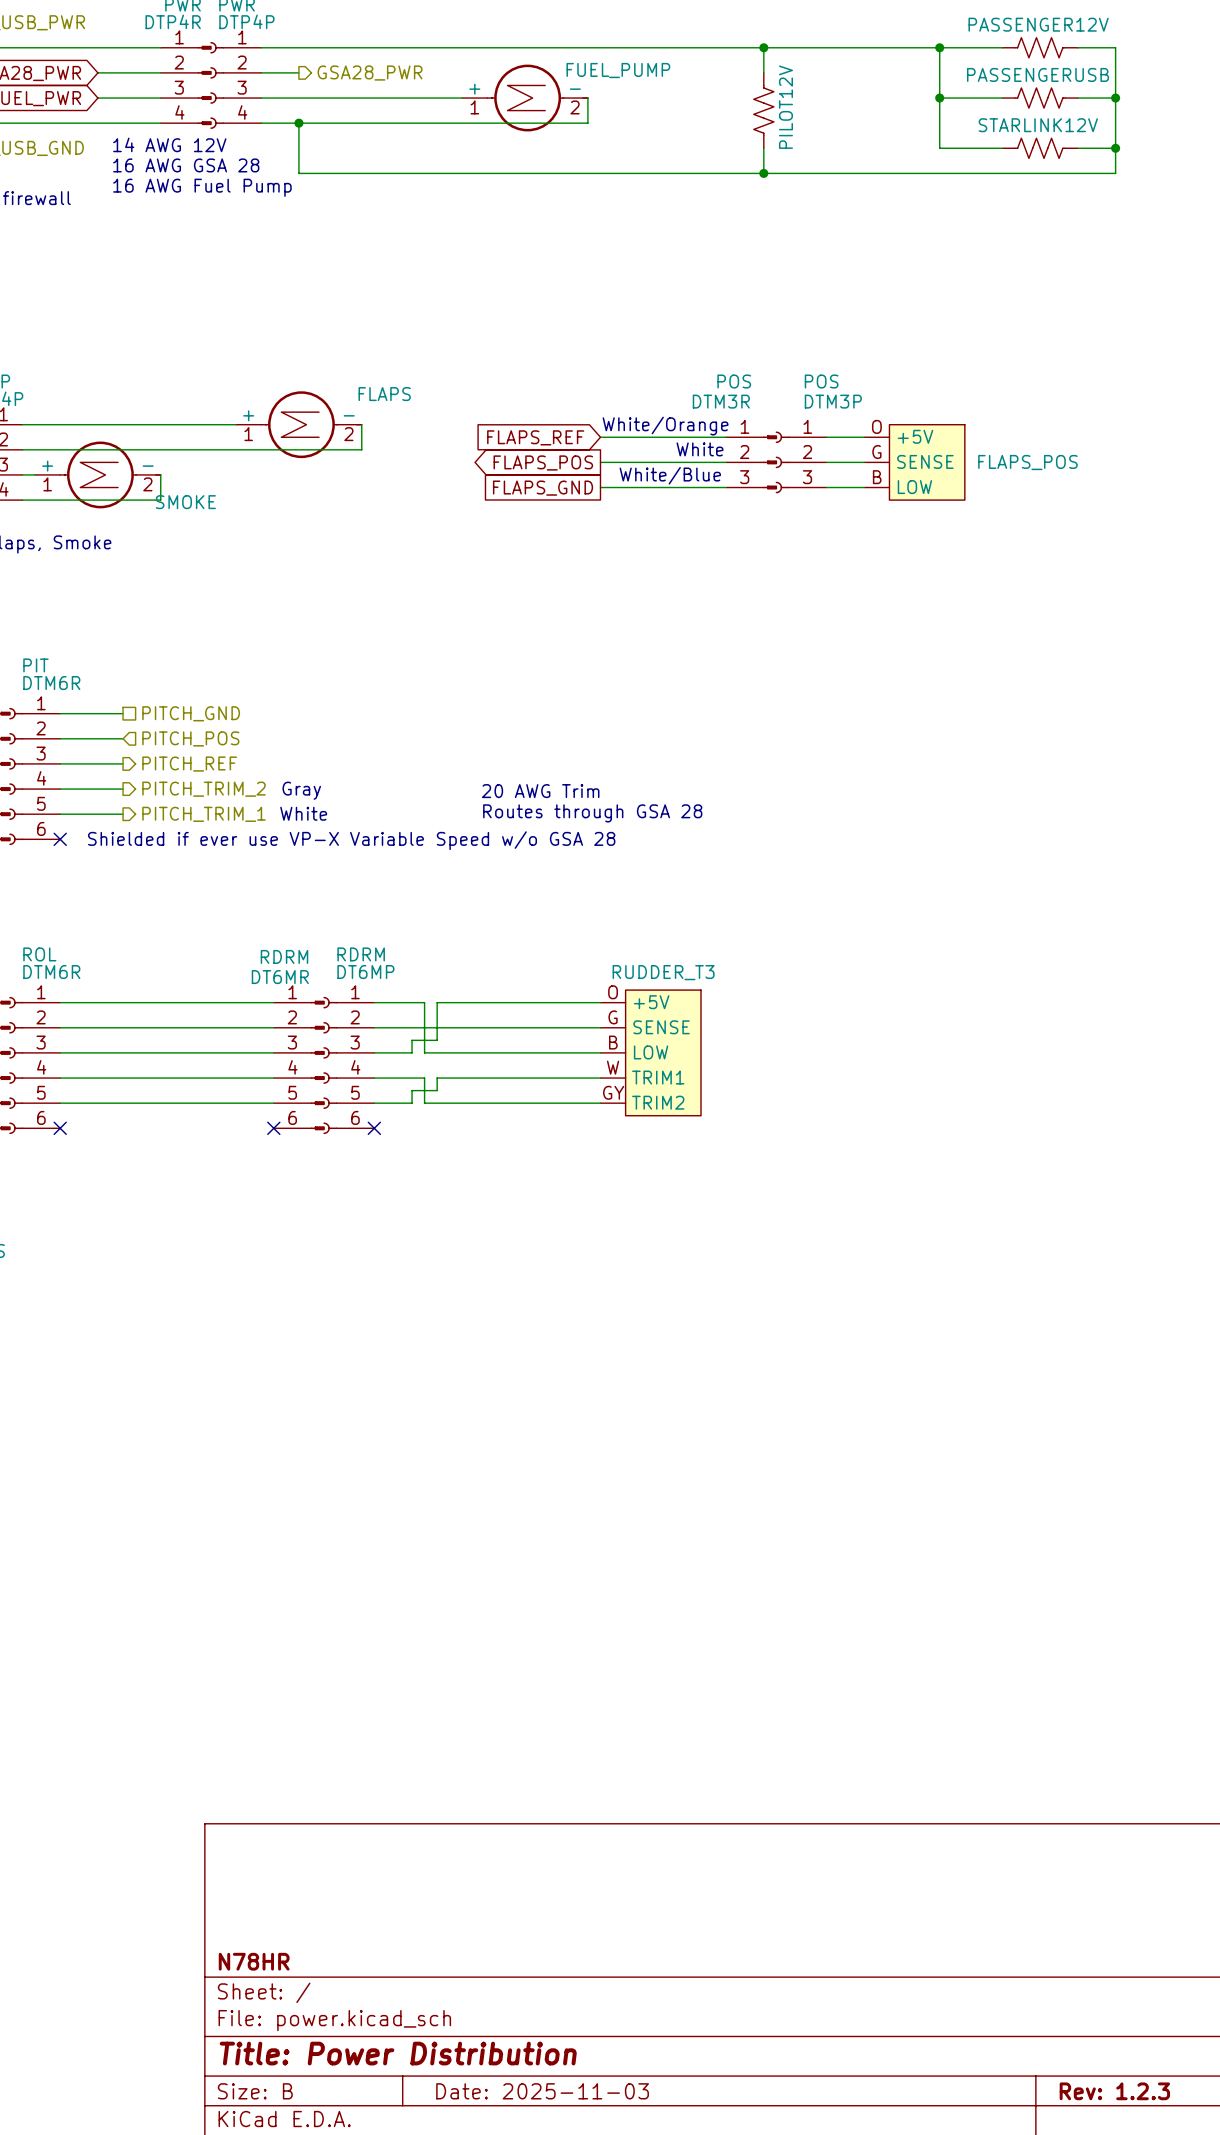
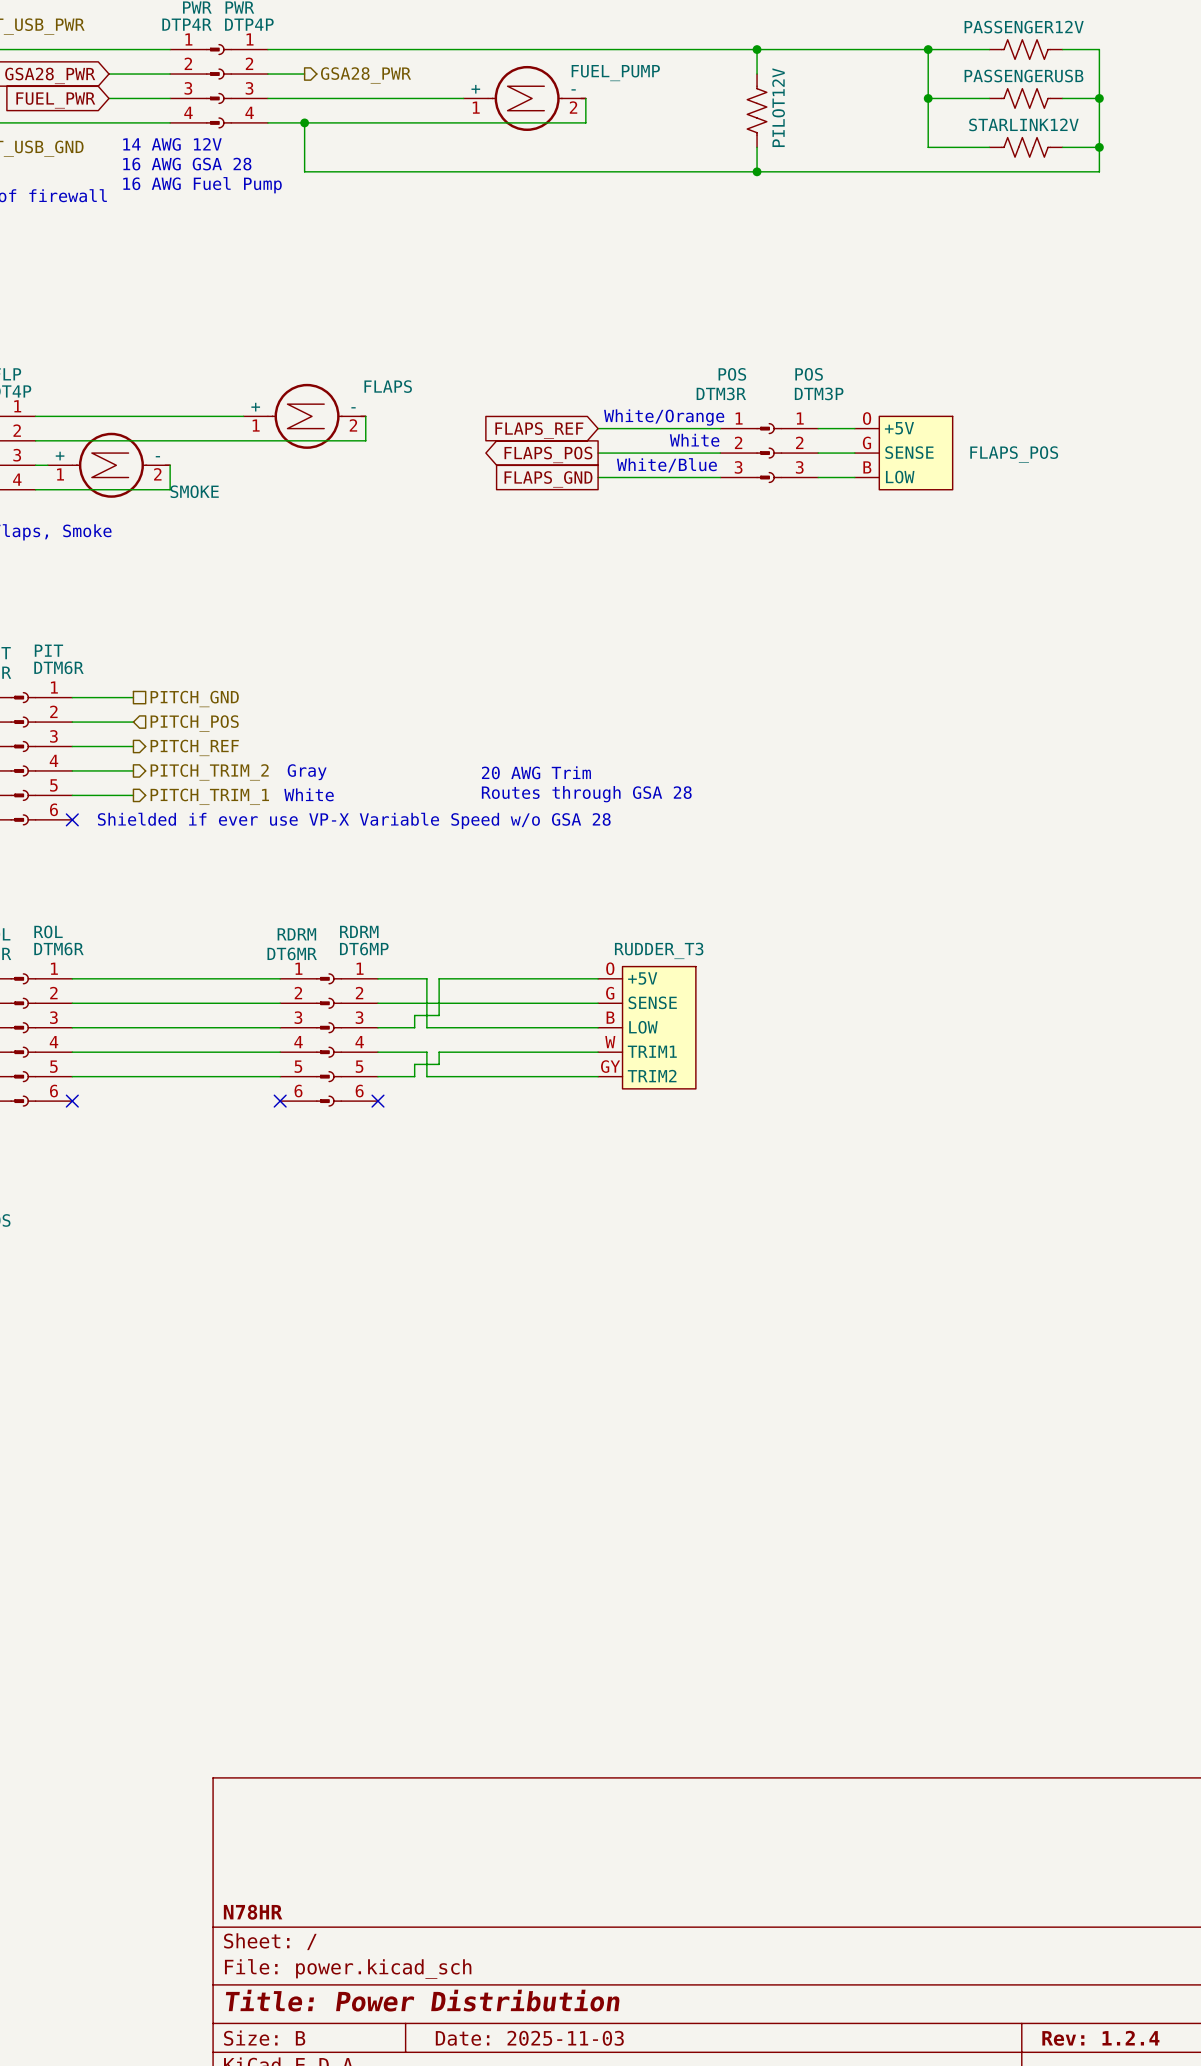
title block: Rev: 1.2.3 (1114, 2091) -> Rev: 1.2.4 (1100, 2038)

